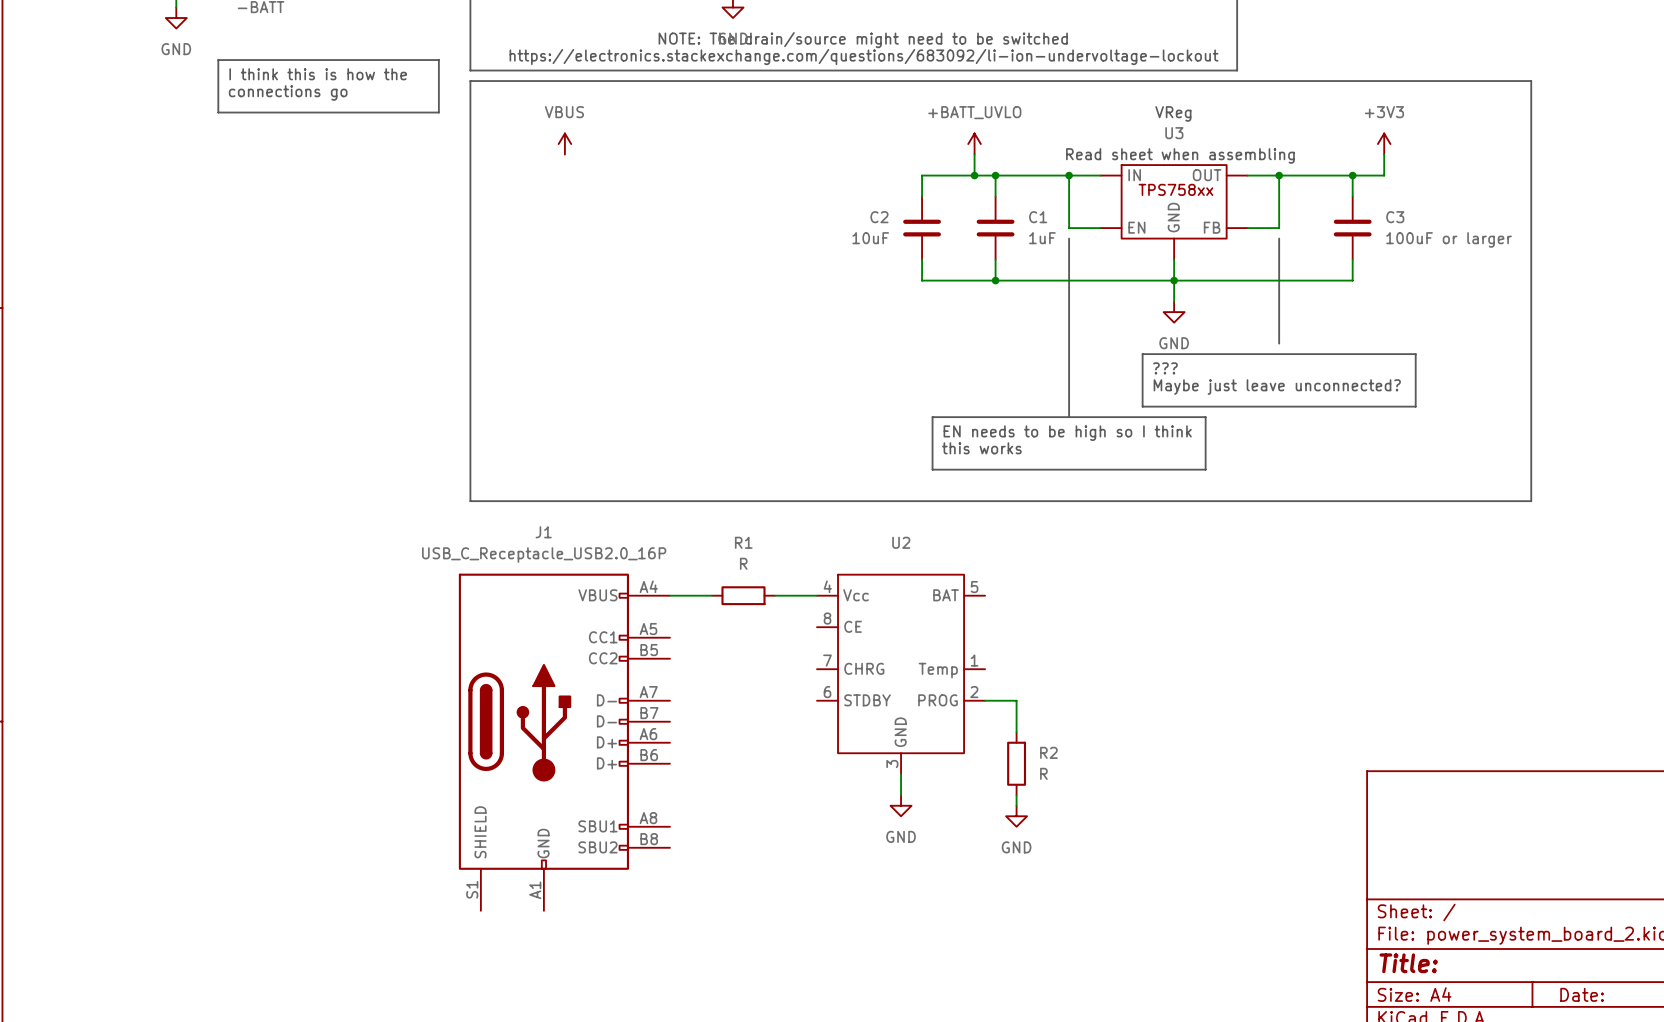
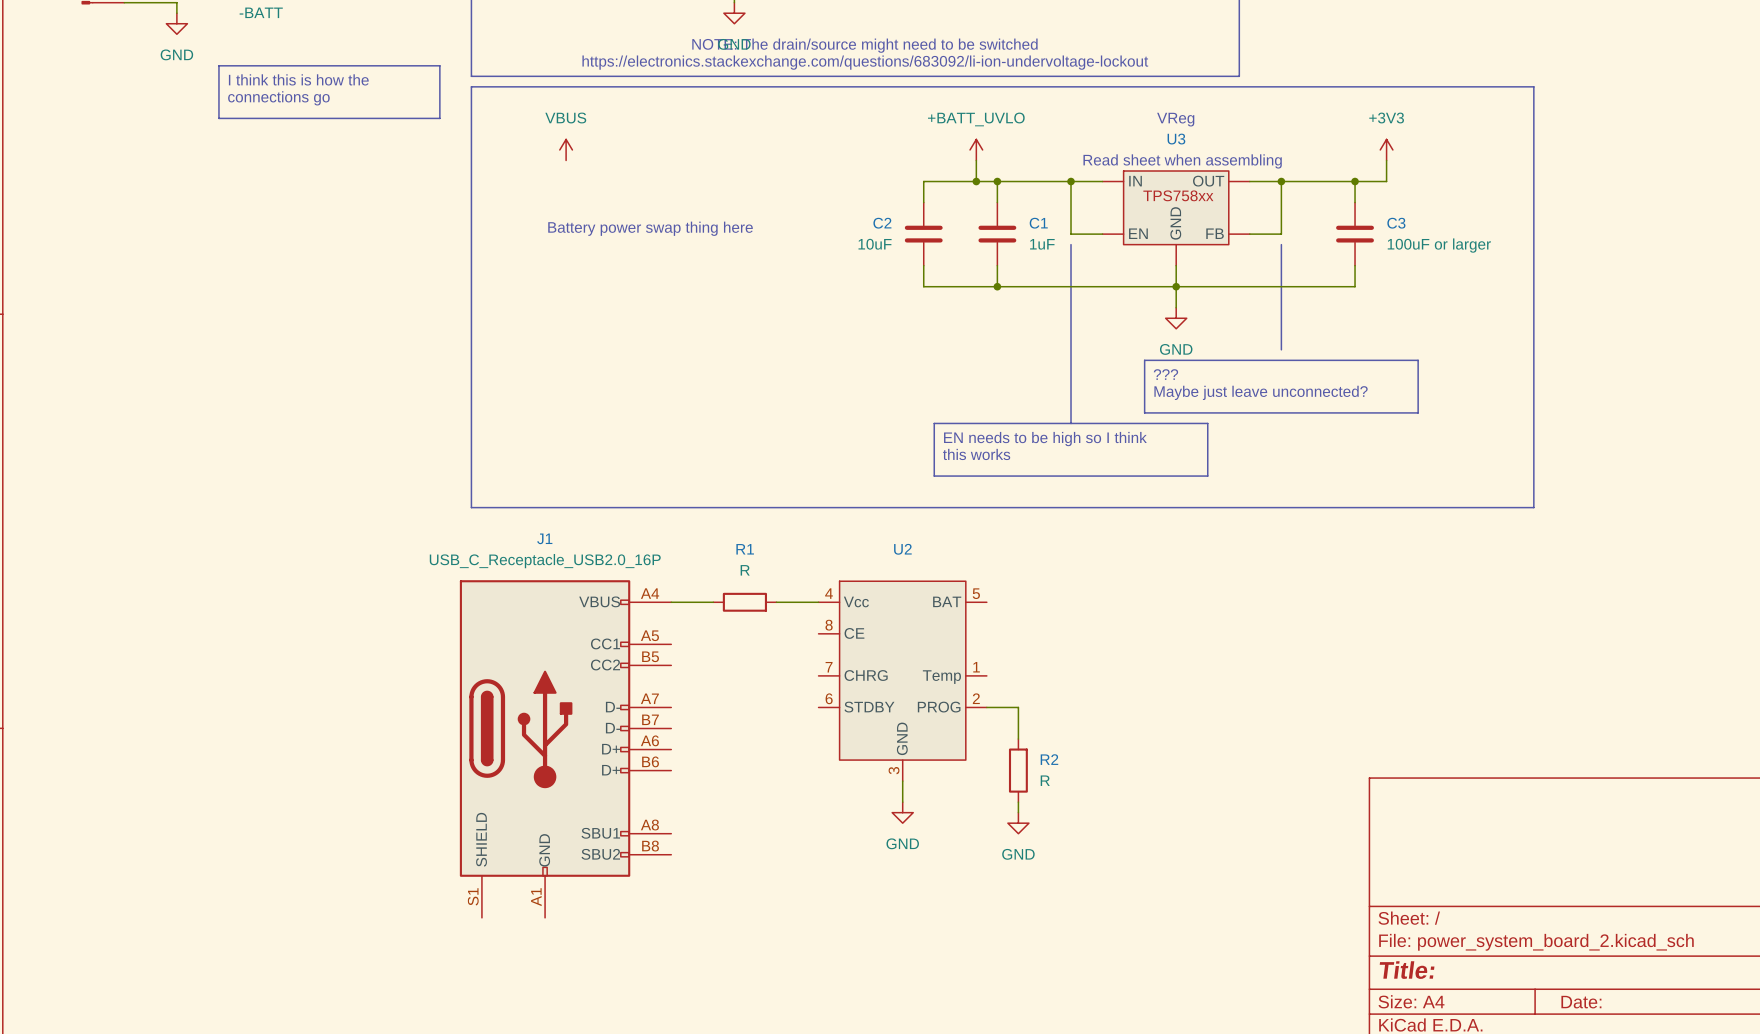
text: none -> Battery power swap thing here (650, 228)

